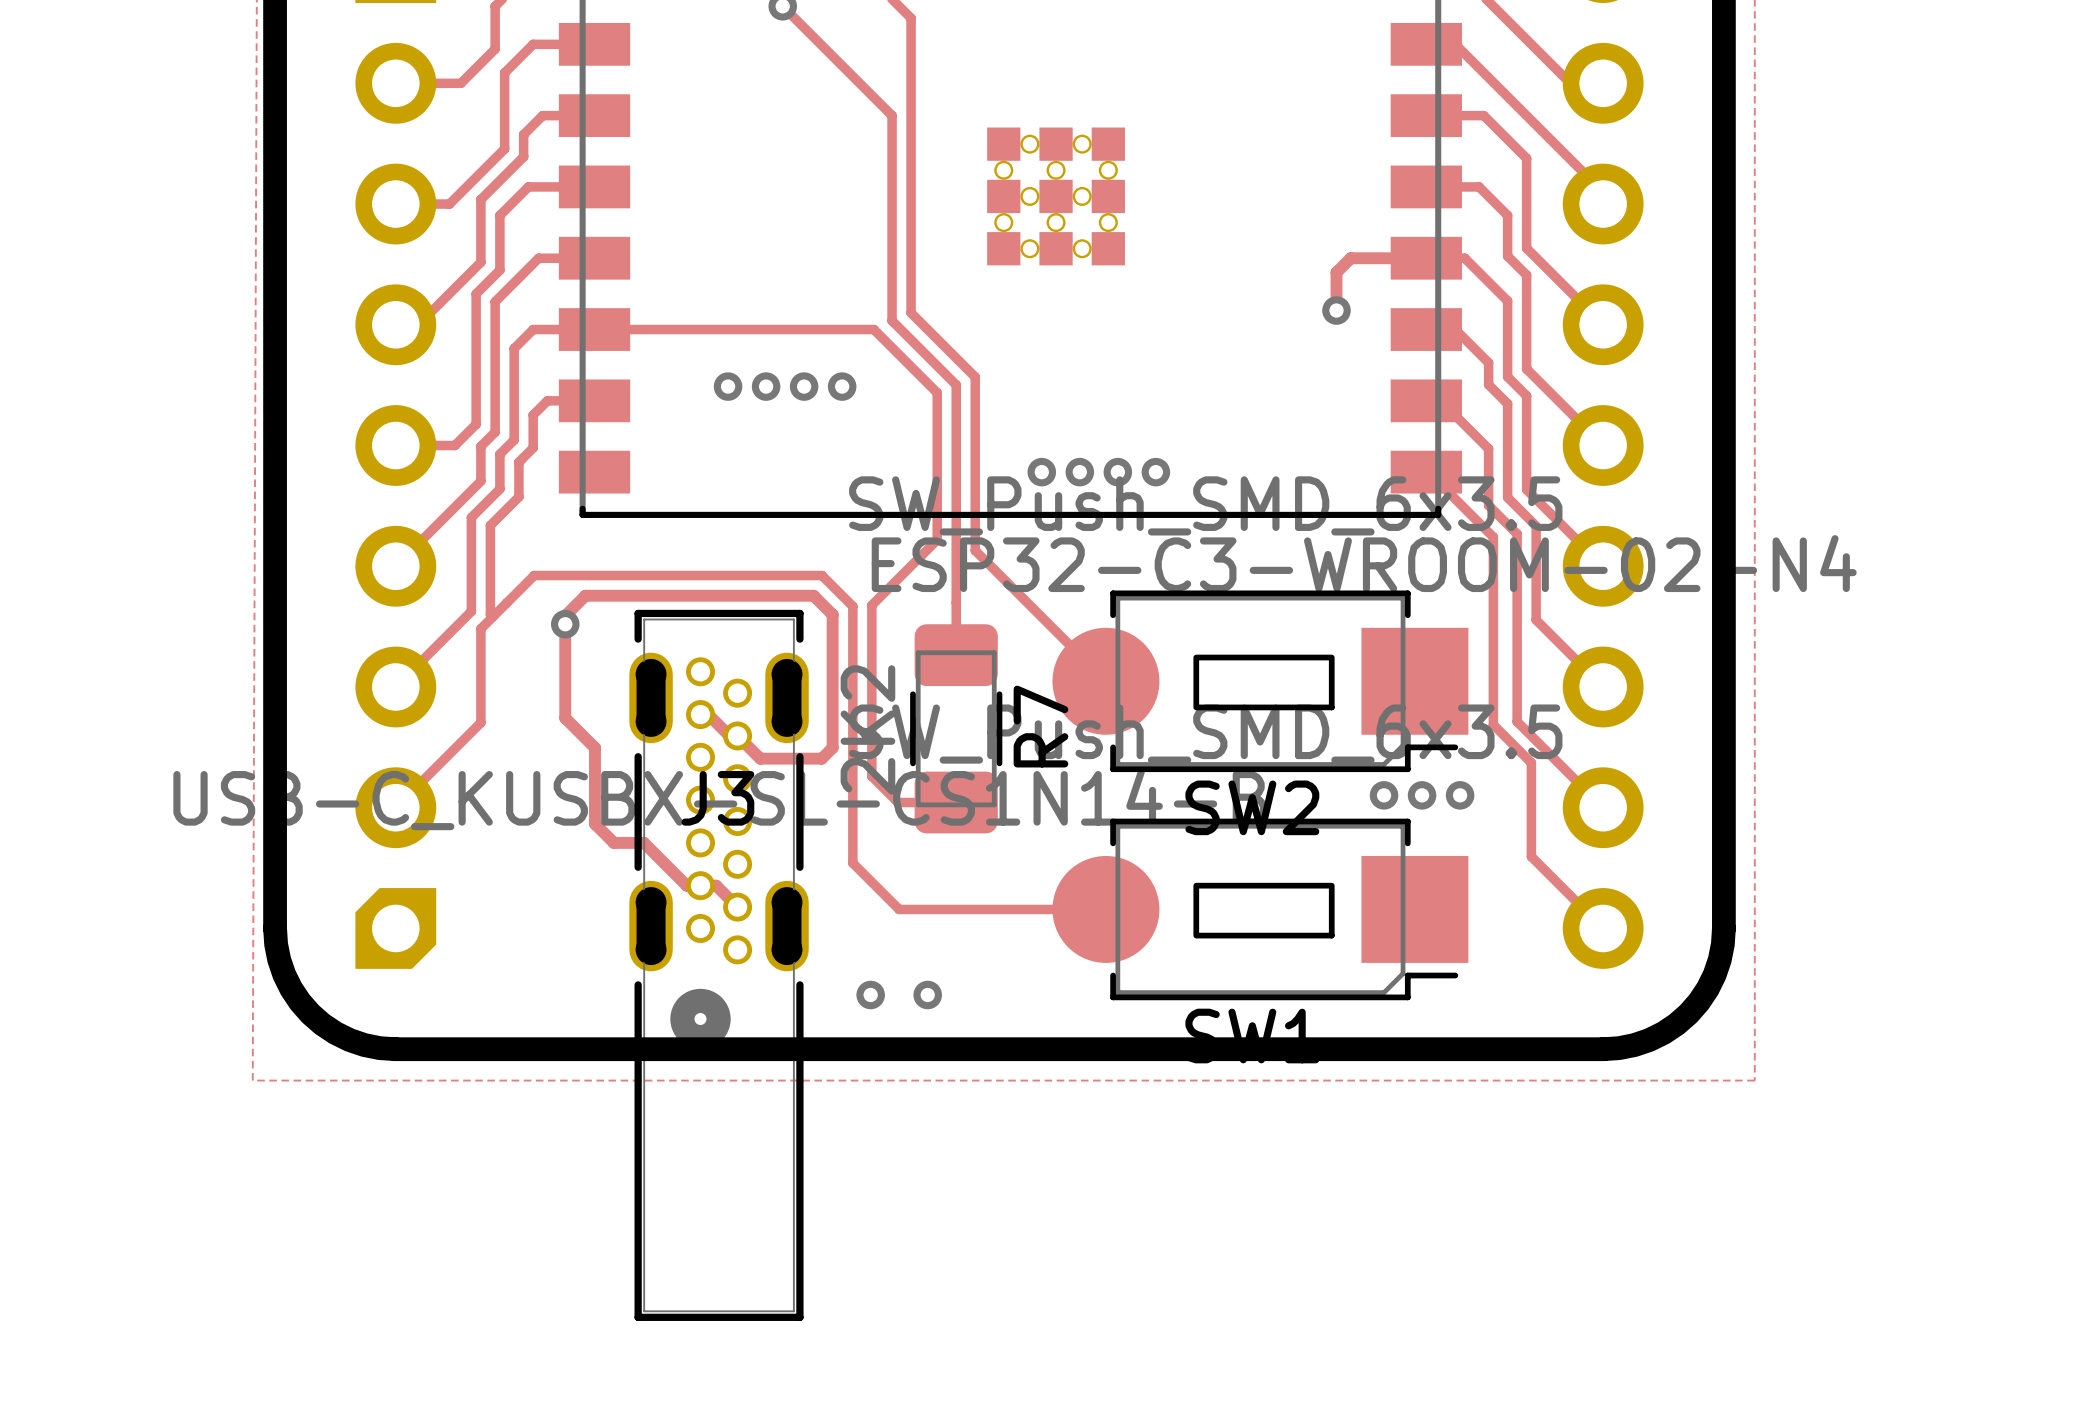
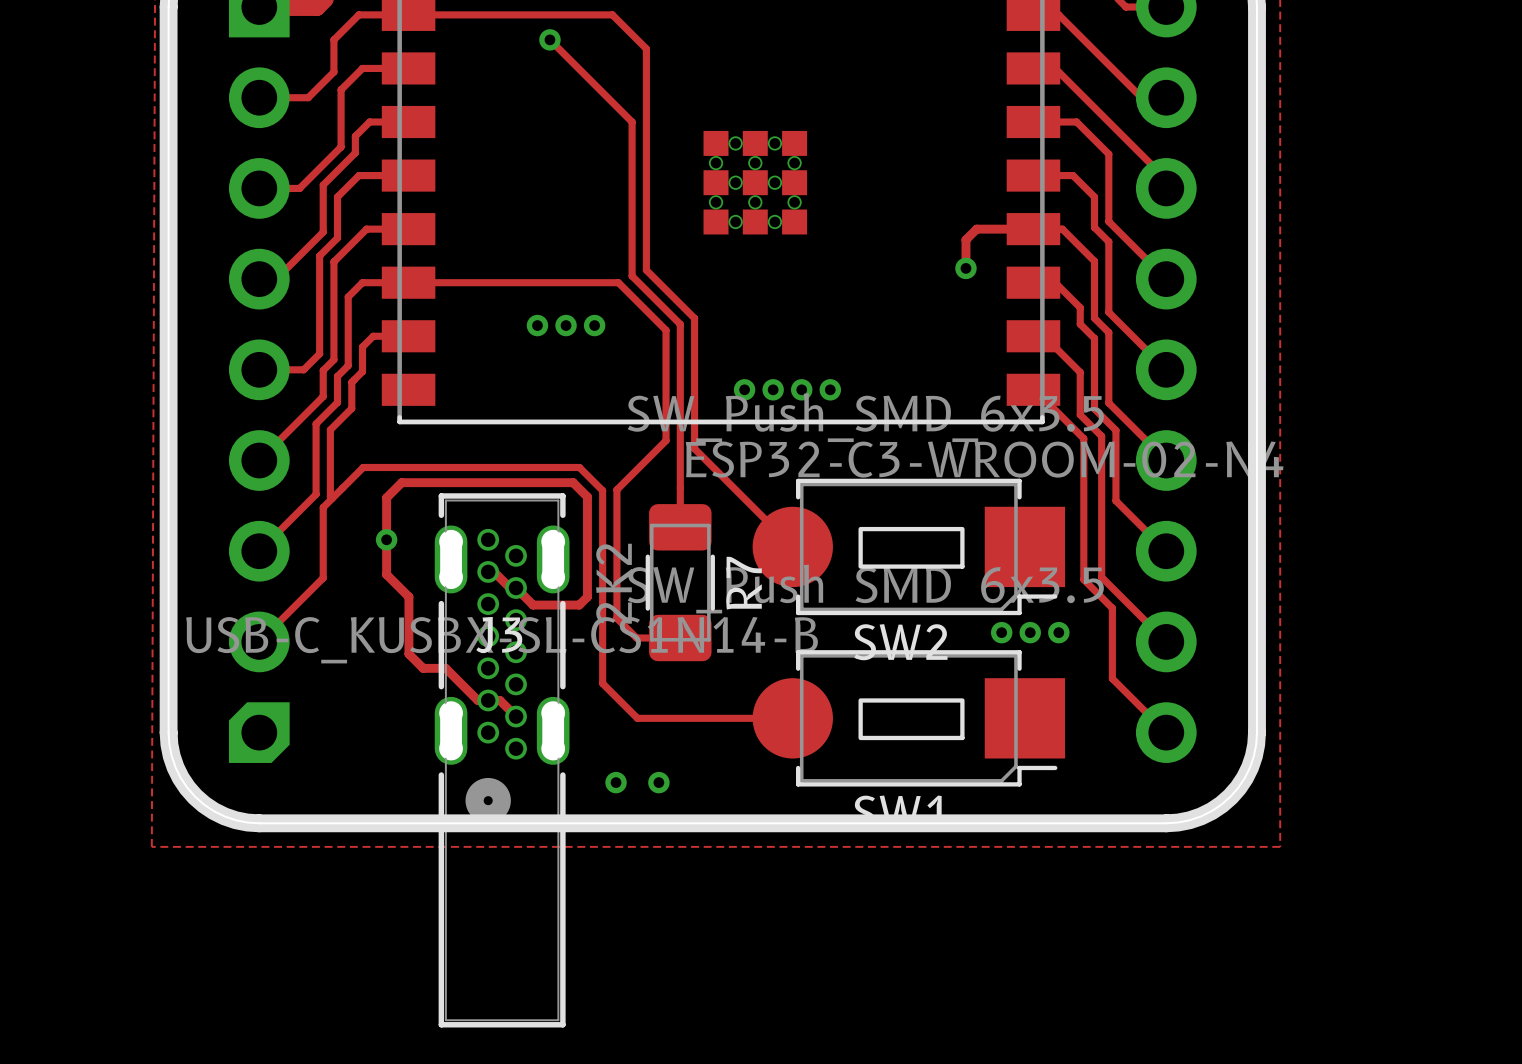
via: (728, 386) -> none
via position: (565, 624) -> (386, 539)

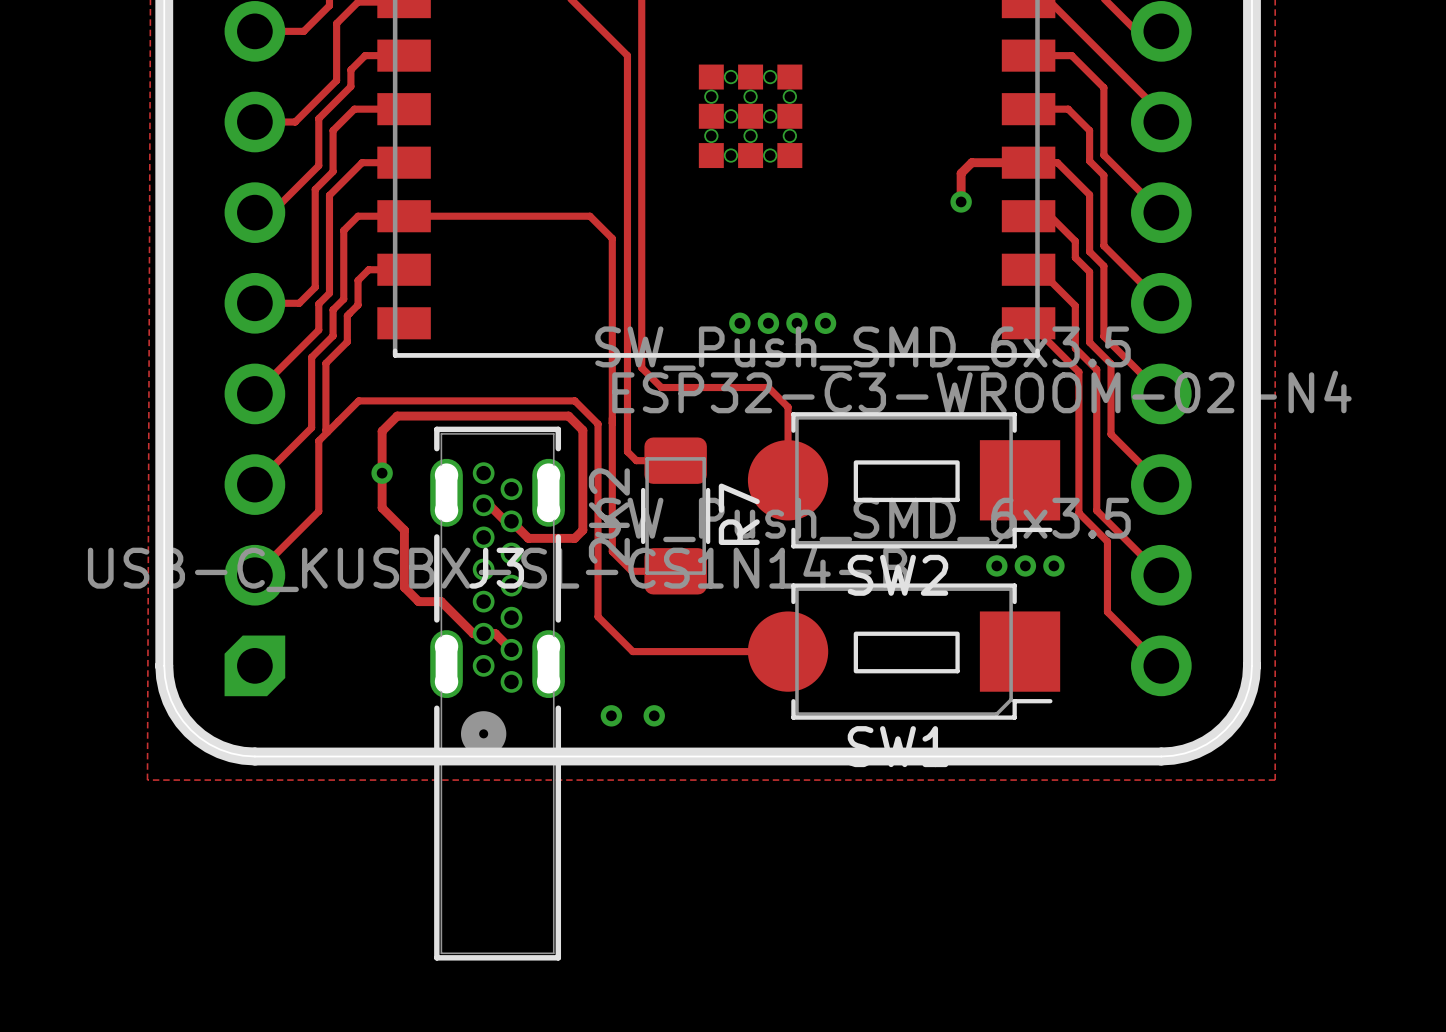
track: (646, 270) (694, 318) (694, 448) (792, 546) -> (641, 203) (641, 367) (661, 387) (768, 387) (788, 407) (788, 480)
track: (632, 276) (680, 324) (680, 527) -> (627, 209) (627, 451) (636, 460) (675, 460)
track: (594, 282) (618, 282) (666, 330) (666, 440) (616, 489) -> (590, 216) (612, 238) (612, 423)
via: (537, 325) -> none
via: (566, 325) -> none
via: (594, 325) -> none

